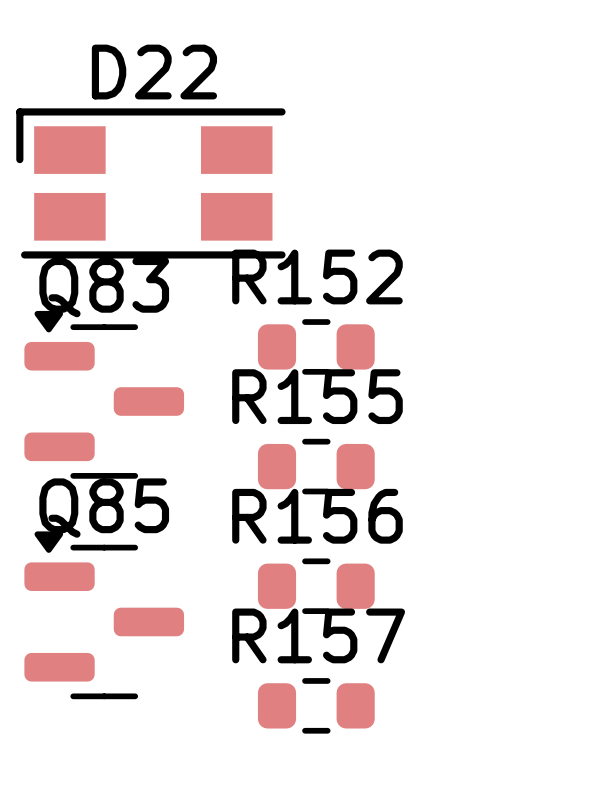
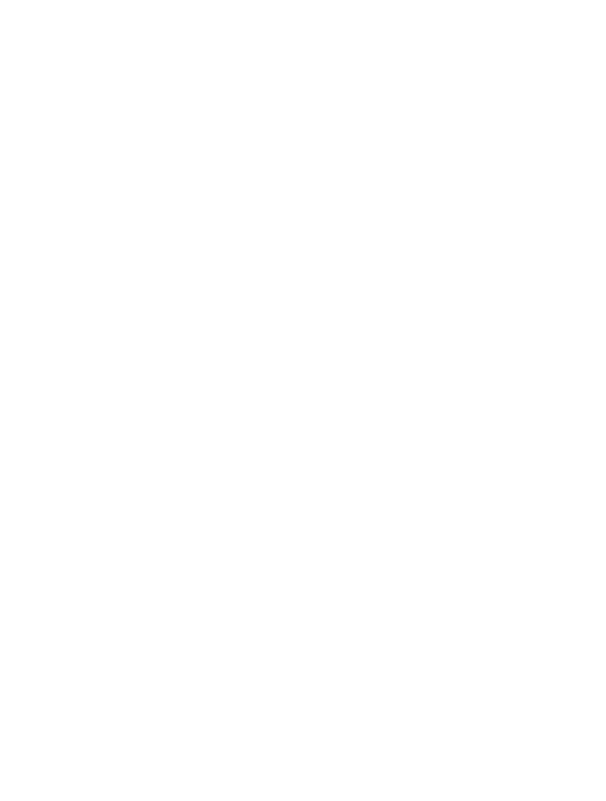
D22: (150, 183) -> none
R152: (316, 346) -> none
Q83: (104, 394) -> none
R155: (316, 466) -> none
R156: (316, 586) -> none
Q85: (104, 615) -> none
R157: (316, 705) -> none

